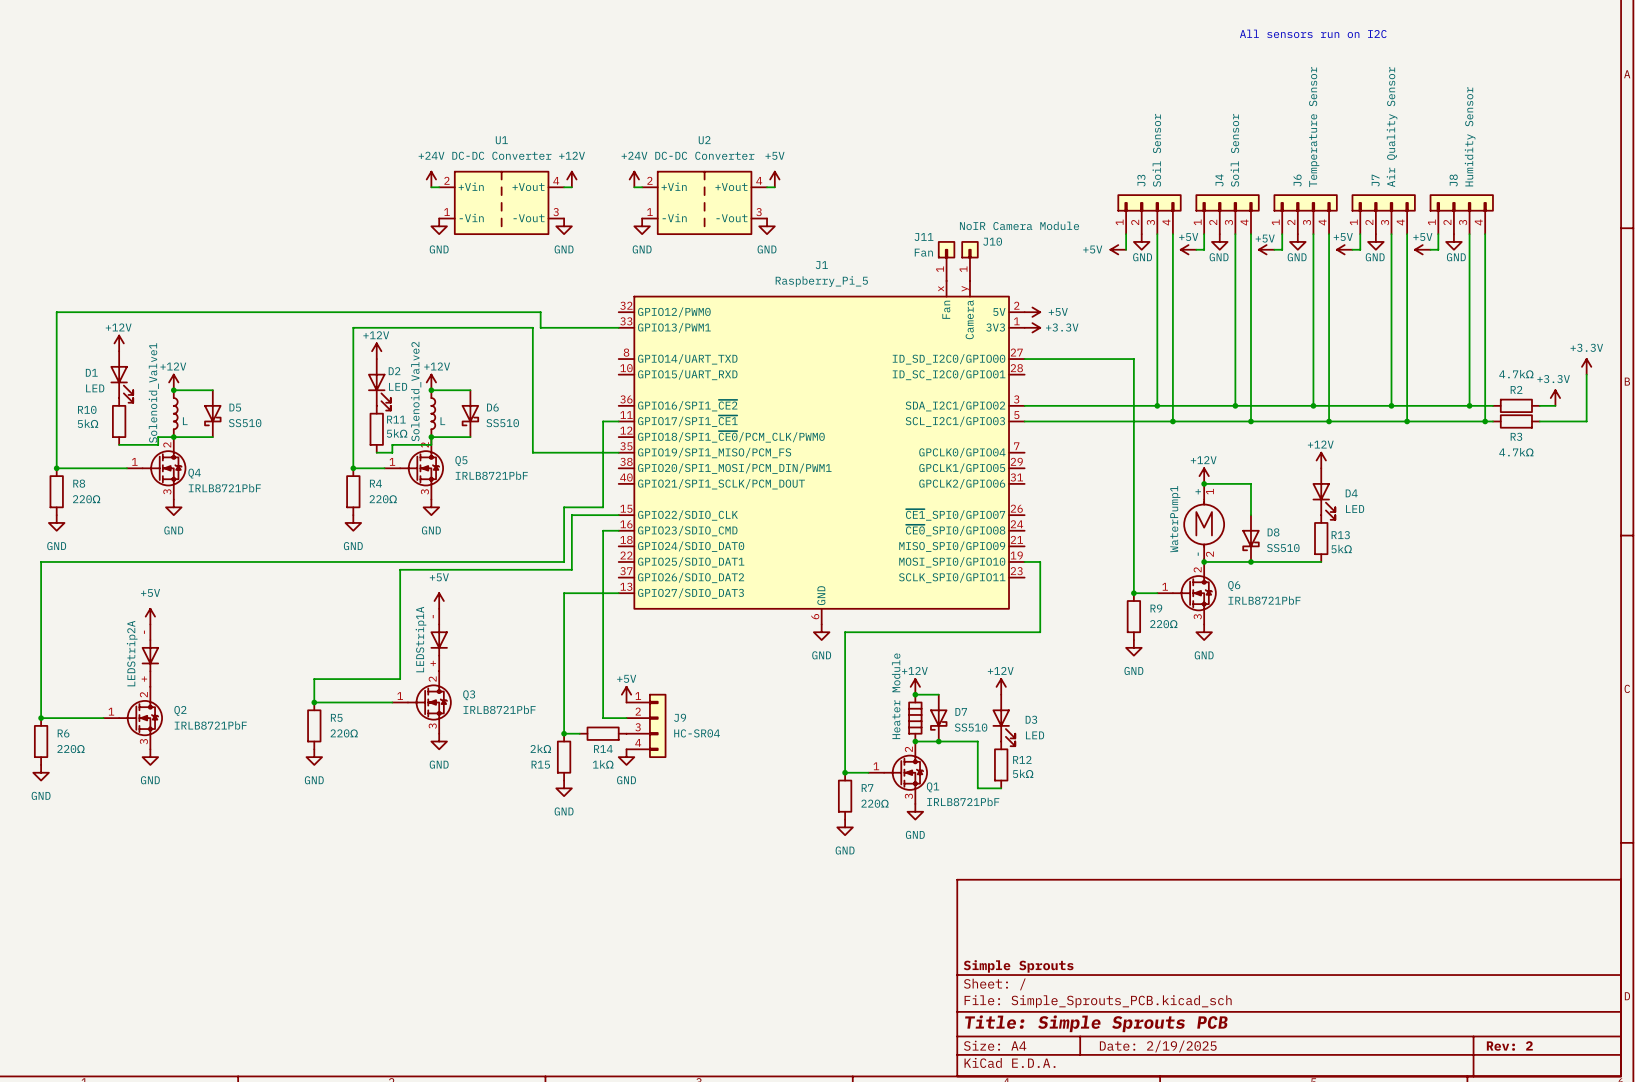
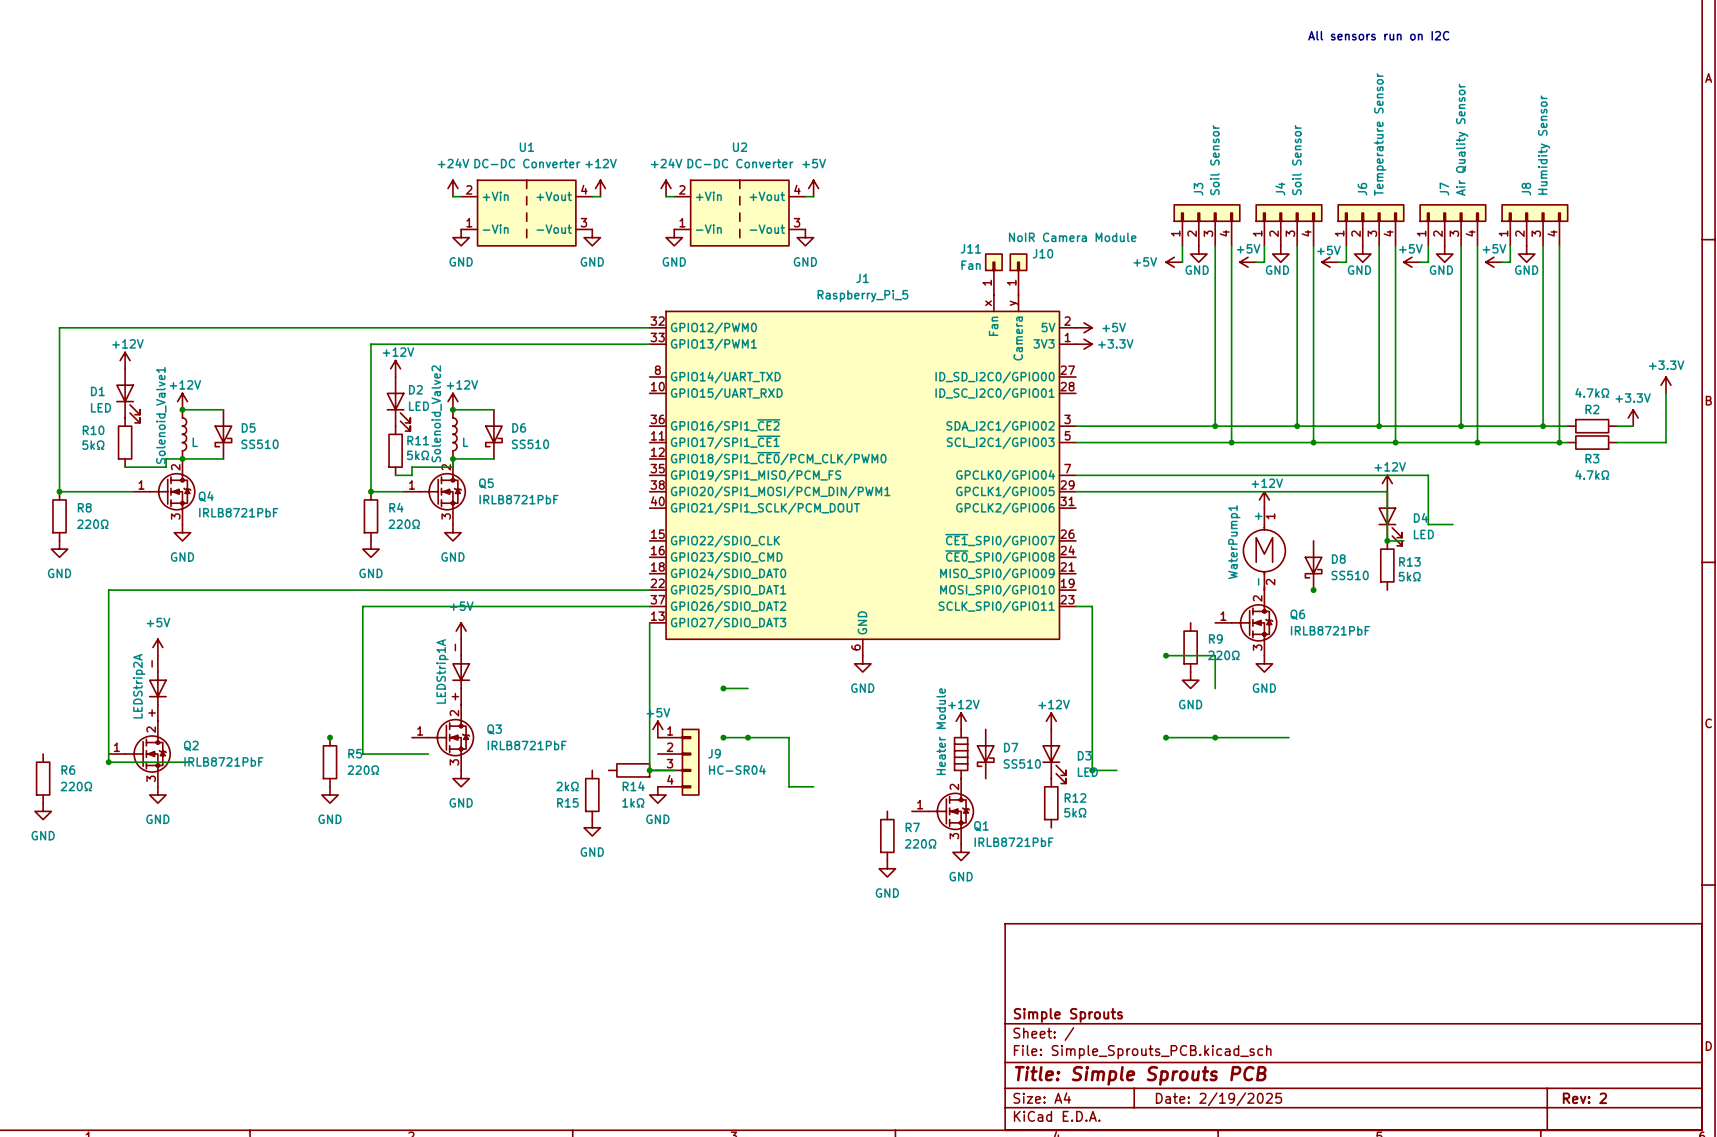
wire: (540, 312) (540, 327) -> (559, 344) (567, 344)
wire: none -> (567, 327) (649, 327)
wire: (532, 327) (532, 452) (618, 452) -> none
wire: (1024, 359) (1133, 359) (1133, 593) (1157, 593) -> none
wire: (618, 421) (603, 421) (603, 507) (564, 507) (564, 561) -> (649, 590) (592, 590)
wire: none -> (1075, 475) (1428, 475) (1428, 524) (1452, 524)
wire: none -> (1075, 491) (1387, 491) (1387, 540) (1403, 540)
wire: (1204, 483) (1250, 483) (1250, 515) -> none
junction: (1204, 483) -> none
wire: (618, 515) (571, 515) (571, 569) (400, 569) (400, 679) (314, 679) (314, 702) (392, 702) -> none
junction: none -> (1387, 540)
wire: (618, 530) (603, 530) (603, 718) (626, 718) -> none
wire: (103, 561) (41, 561) (41, 718) (103, 718) -> (108, 590) (108, 762) (190, 762)
wire: (1024, 561) (1040, 561) (1040, 577) -> (1075, 606) (1092, 606)
wire: (1204, 561) (1321, 561) -> none
junction: (1204, 561) -> none
wire: none -> (649, 606) (362, 606) (362, 754) (428, 754)
wire: (618, 593) (564, 593) (564, 733) (579, 733) -> (649, 622) (649, 770) (674, 770)
junction: (1133, 593) -> none
wire: none -> (1166, 655) (1215, 655) (1215, 688)
junction: none -> (1166, 655)
wire: (1040, 632) (845, 632) (845, 772) (868, 772) -> (1092, 663) (1092, 770) (1116, 770)
wire: none -> (723, 688) (748, 688)
junction: none -> (723, 688)
wire: (915, 694) (938, 694) -> none
junction: (915, 694) -> none
wire: none -> (723, 737) (789, 737) (789, 786) (813, 786)
junction: none -> (723, 737)
junction: none -> (748, 737)
wire: none -> (1166, 737) (1288, 737)
junction: none -> (1166, 737)
junction: none -> (1215, 737)
junction: (41, 718) -> none
junction: none -> (108, 762)
junction: (564, 733) -> none
junction: none -> (649, 770)
junction: none -> (1092, 770)
wire: (915, 741) (977, 741) (977, 788) (1001, 788) -> none
junction: (915, 741) -> none
junction: (938, 741) -> none
junction: (845, 772) -> none

